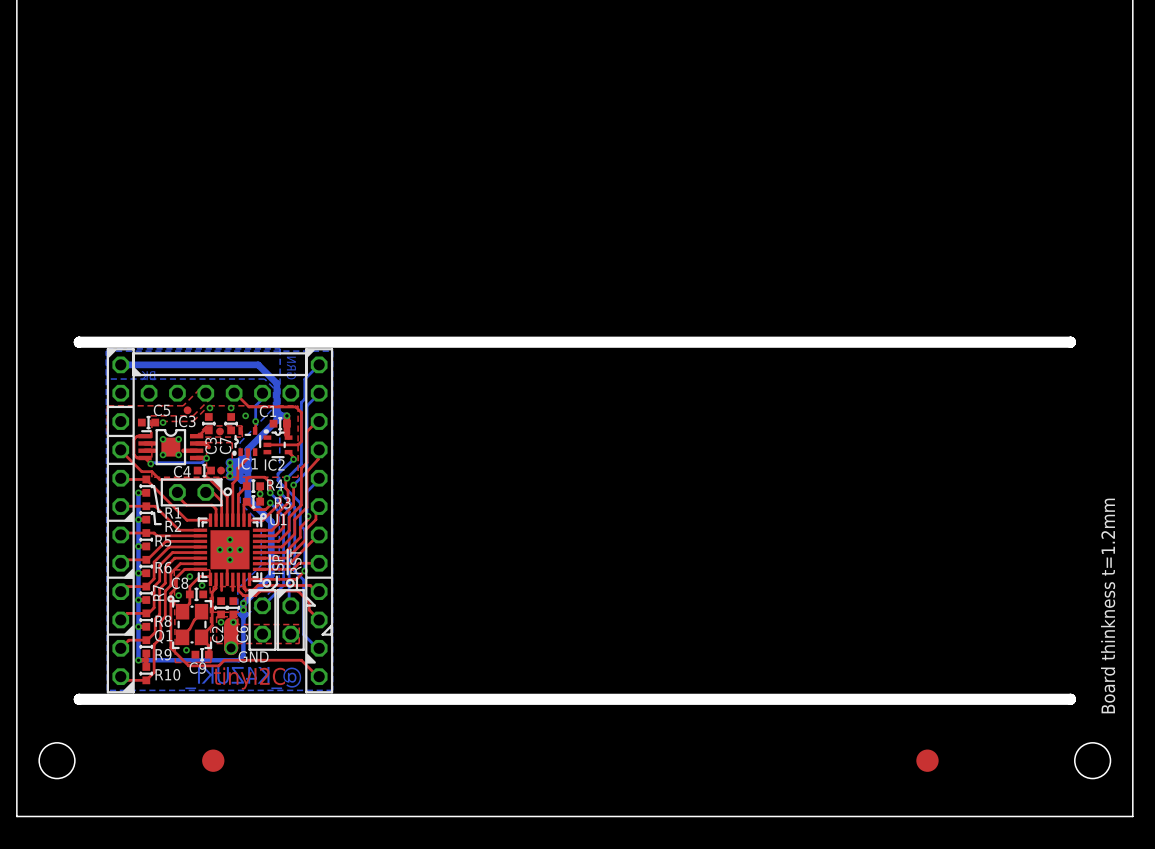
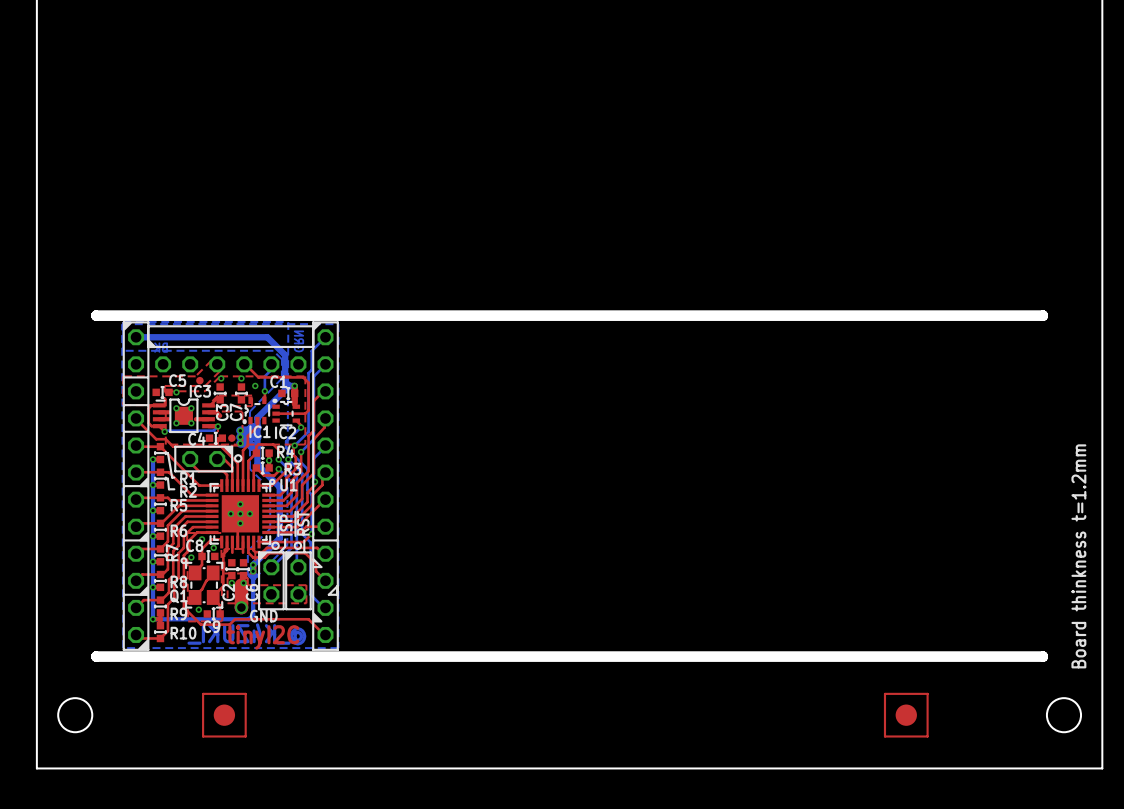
part: (219, 431) -> none
part footprint: [202, 749, 225, 772] -> [202, 692, 247, 738]
part footprint: [916, 749, 939, 772] -> [883, 692, 929, 738]

